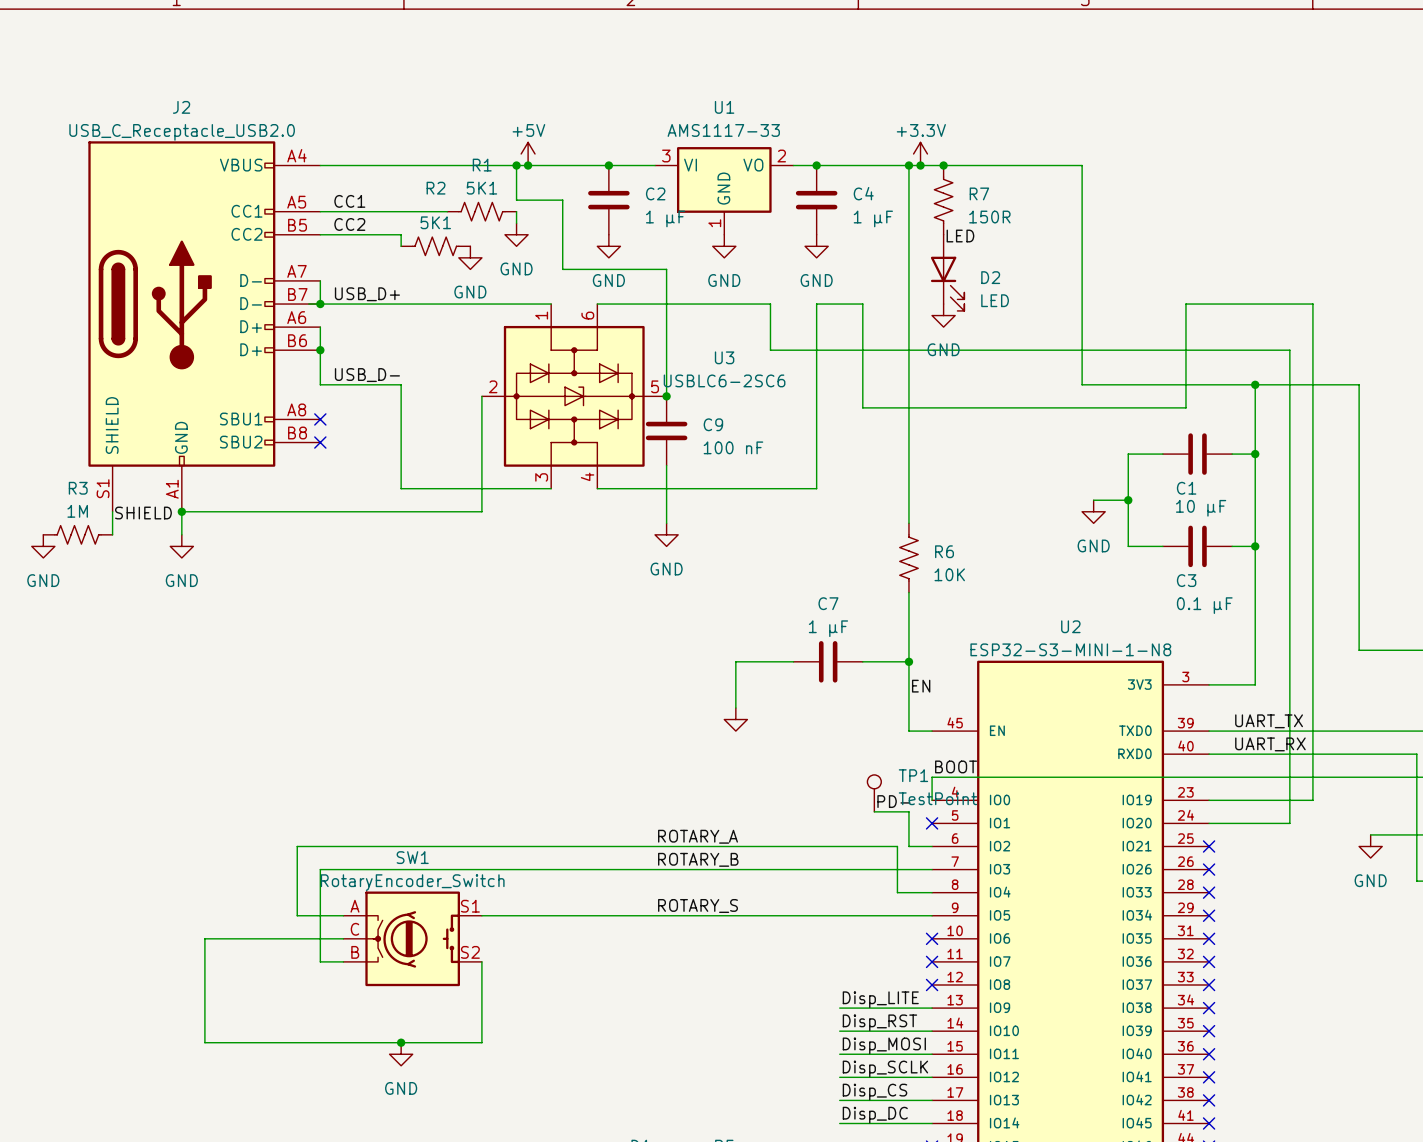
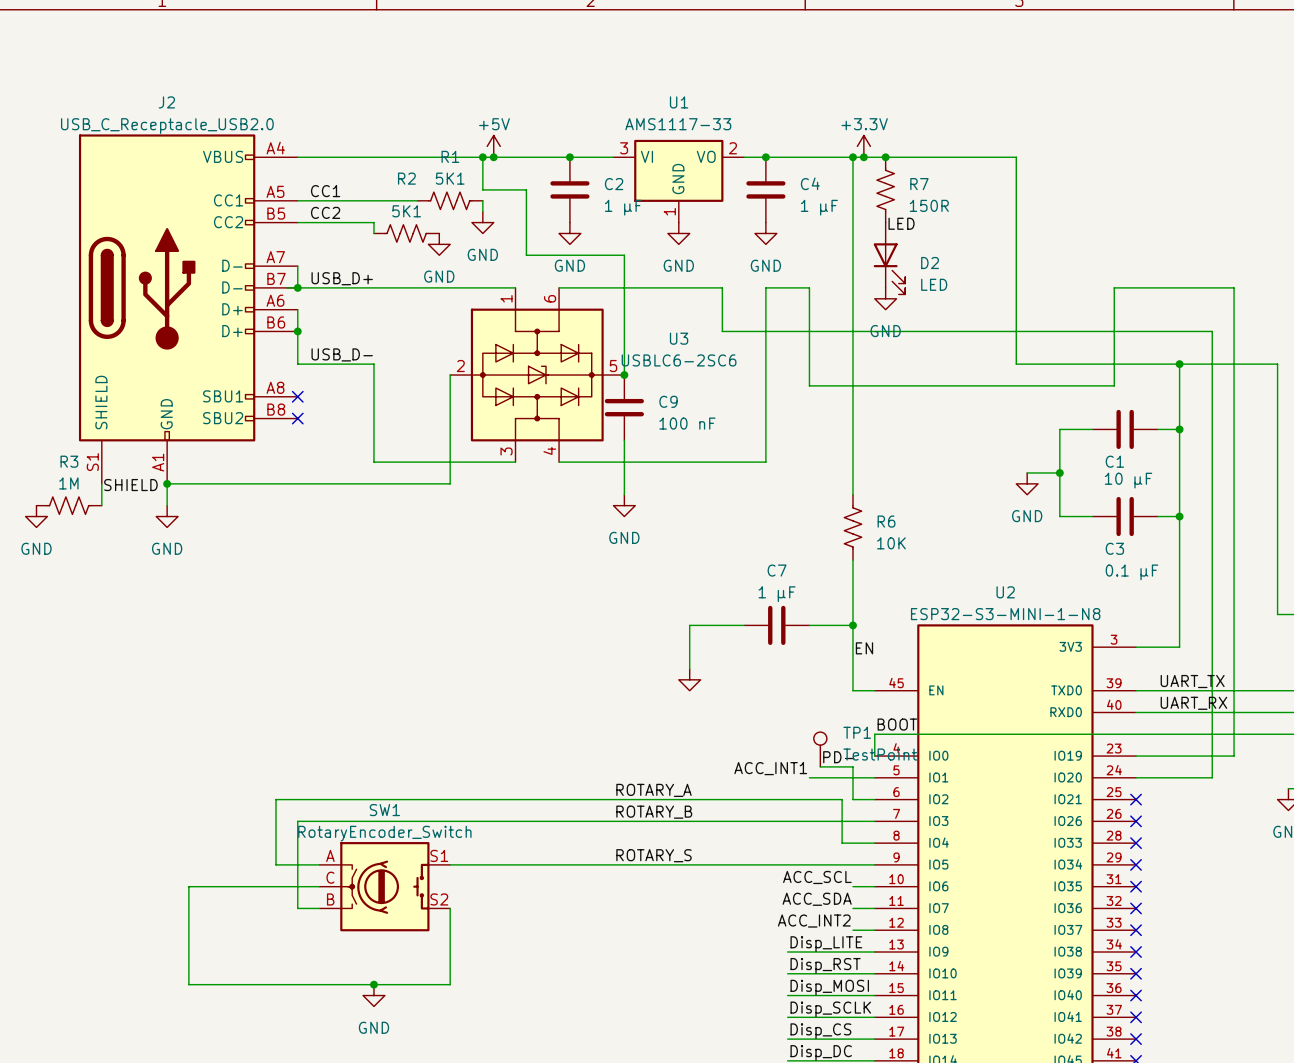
label: none -> ACC_INT1 (770, 768)
wire: none -> (809, 777) (874, 777)
no-connect mark: (932, 823) -> none
label: none -> ACC_SCL (817, 877)
wire: none -> (852, 886) (874, 886)
no-connect mark: (932, 938) -> none
label: none -> ACC_SDA (817, 899)
wire: none -> (852, 908) (874, 908)
no-connect mark: (932, 961) -> none
label: none -> ACC_INT2 (814, 921)
wire: none -> (852, 930) (874, 930)
no-connect mark: (932, 984) -> none

